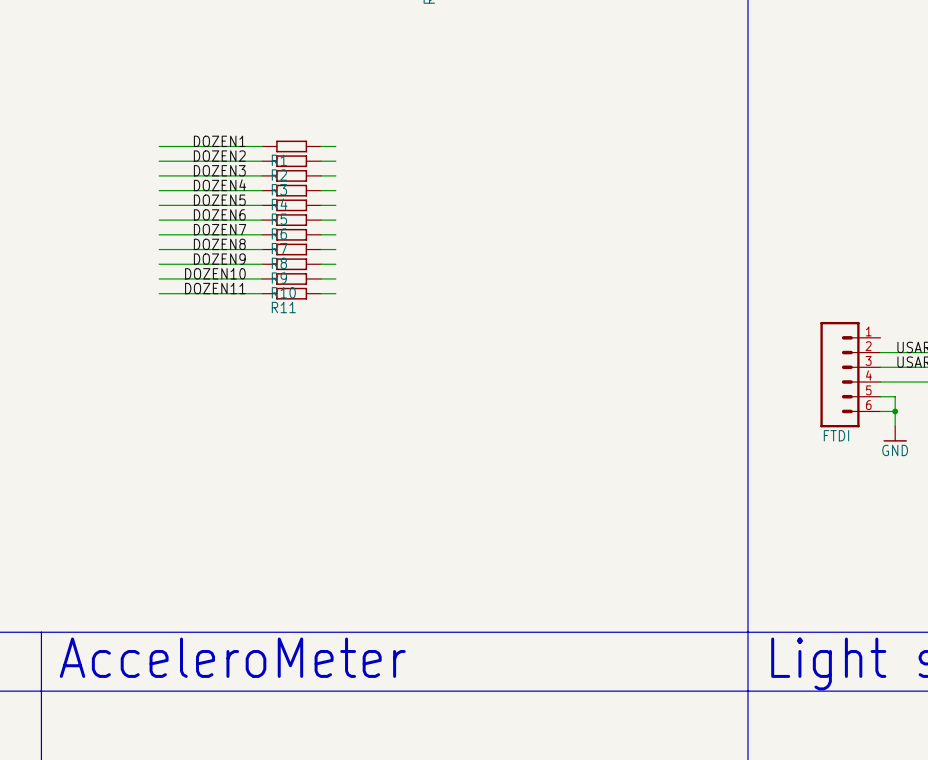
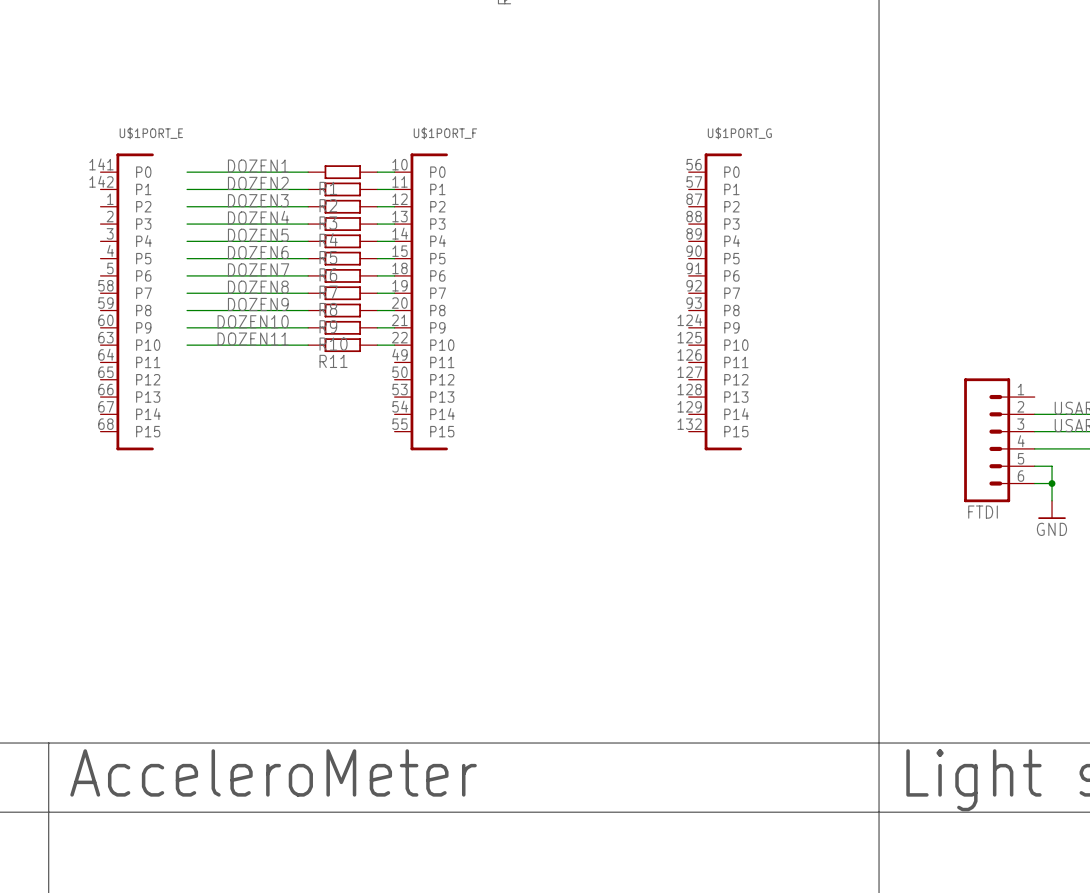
U$1PORT_E: none -> (127, 301)
U$1PORT_F: none -> (421, 301)
U$1PORT_G: none -> (715, 301)

